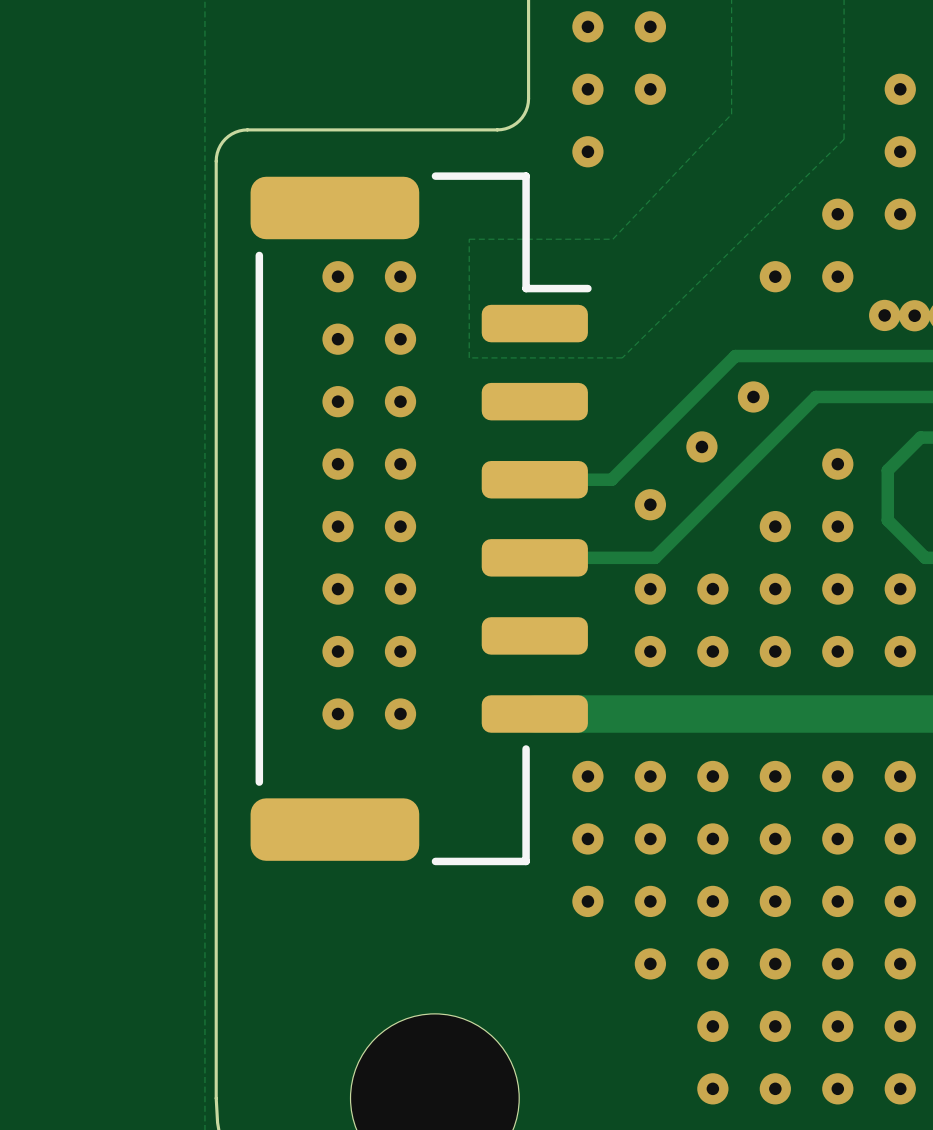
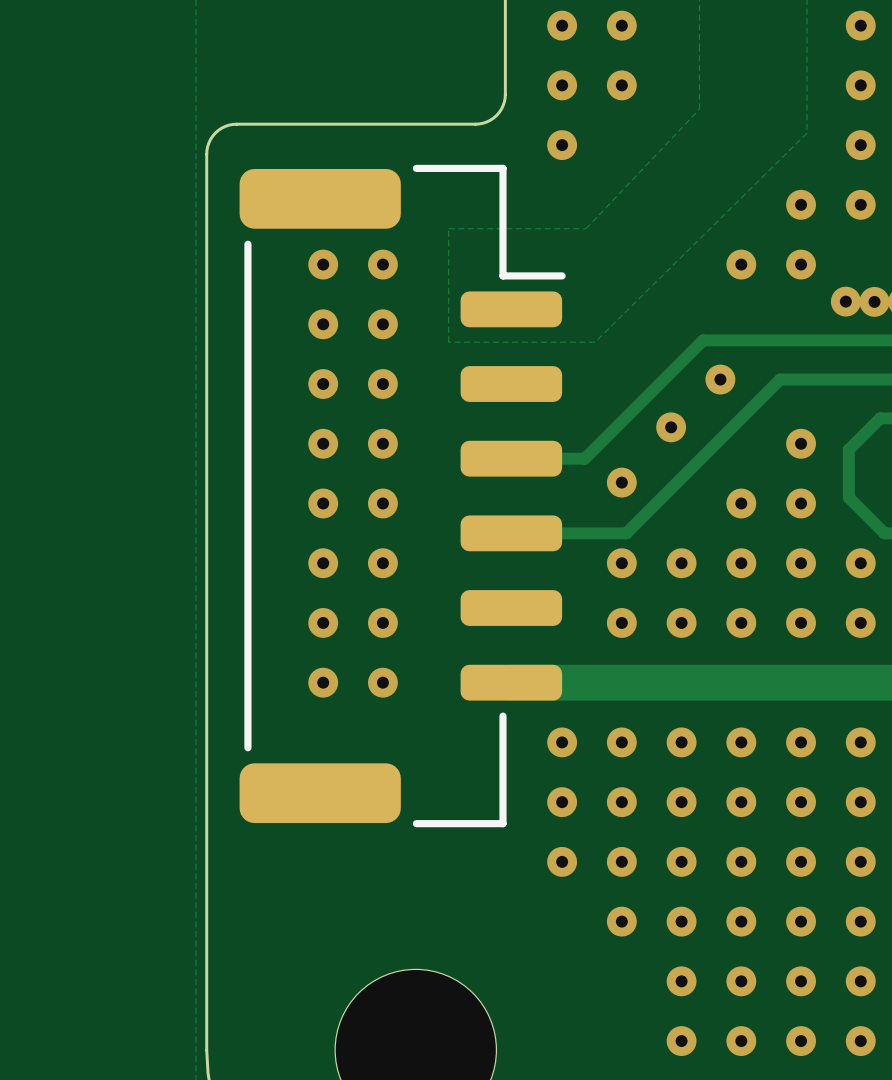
via: none -> (860, 25)

